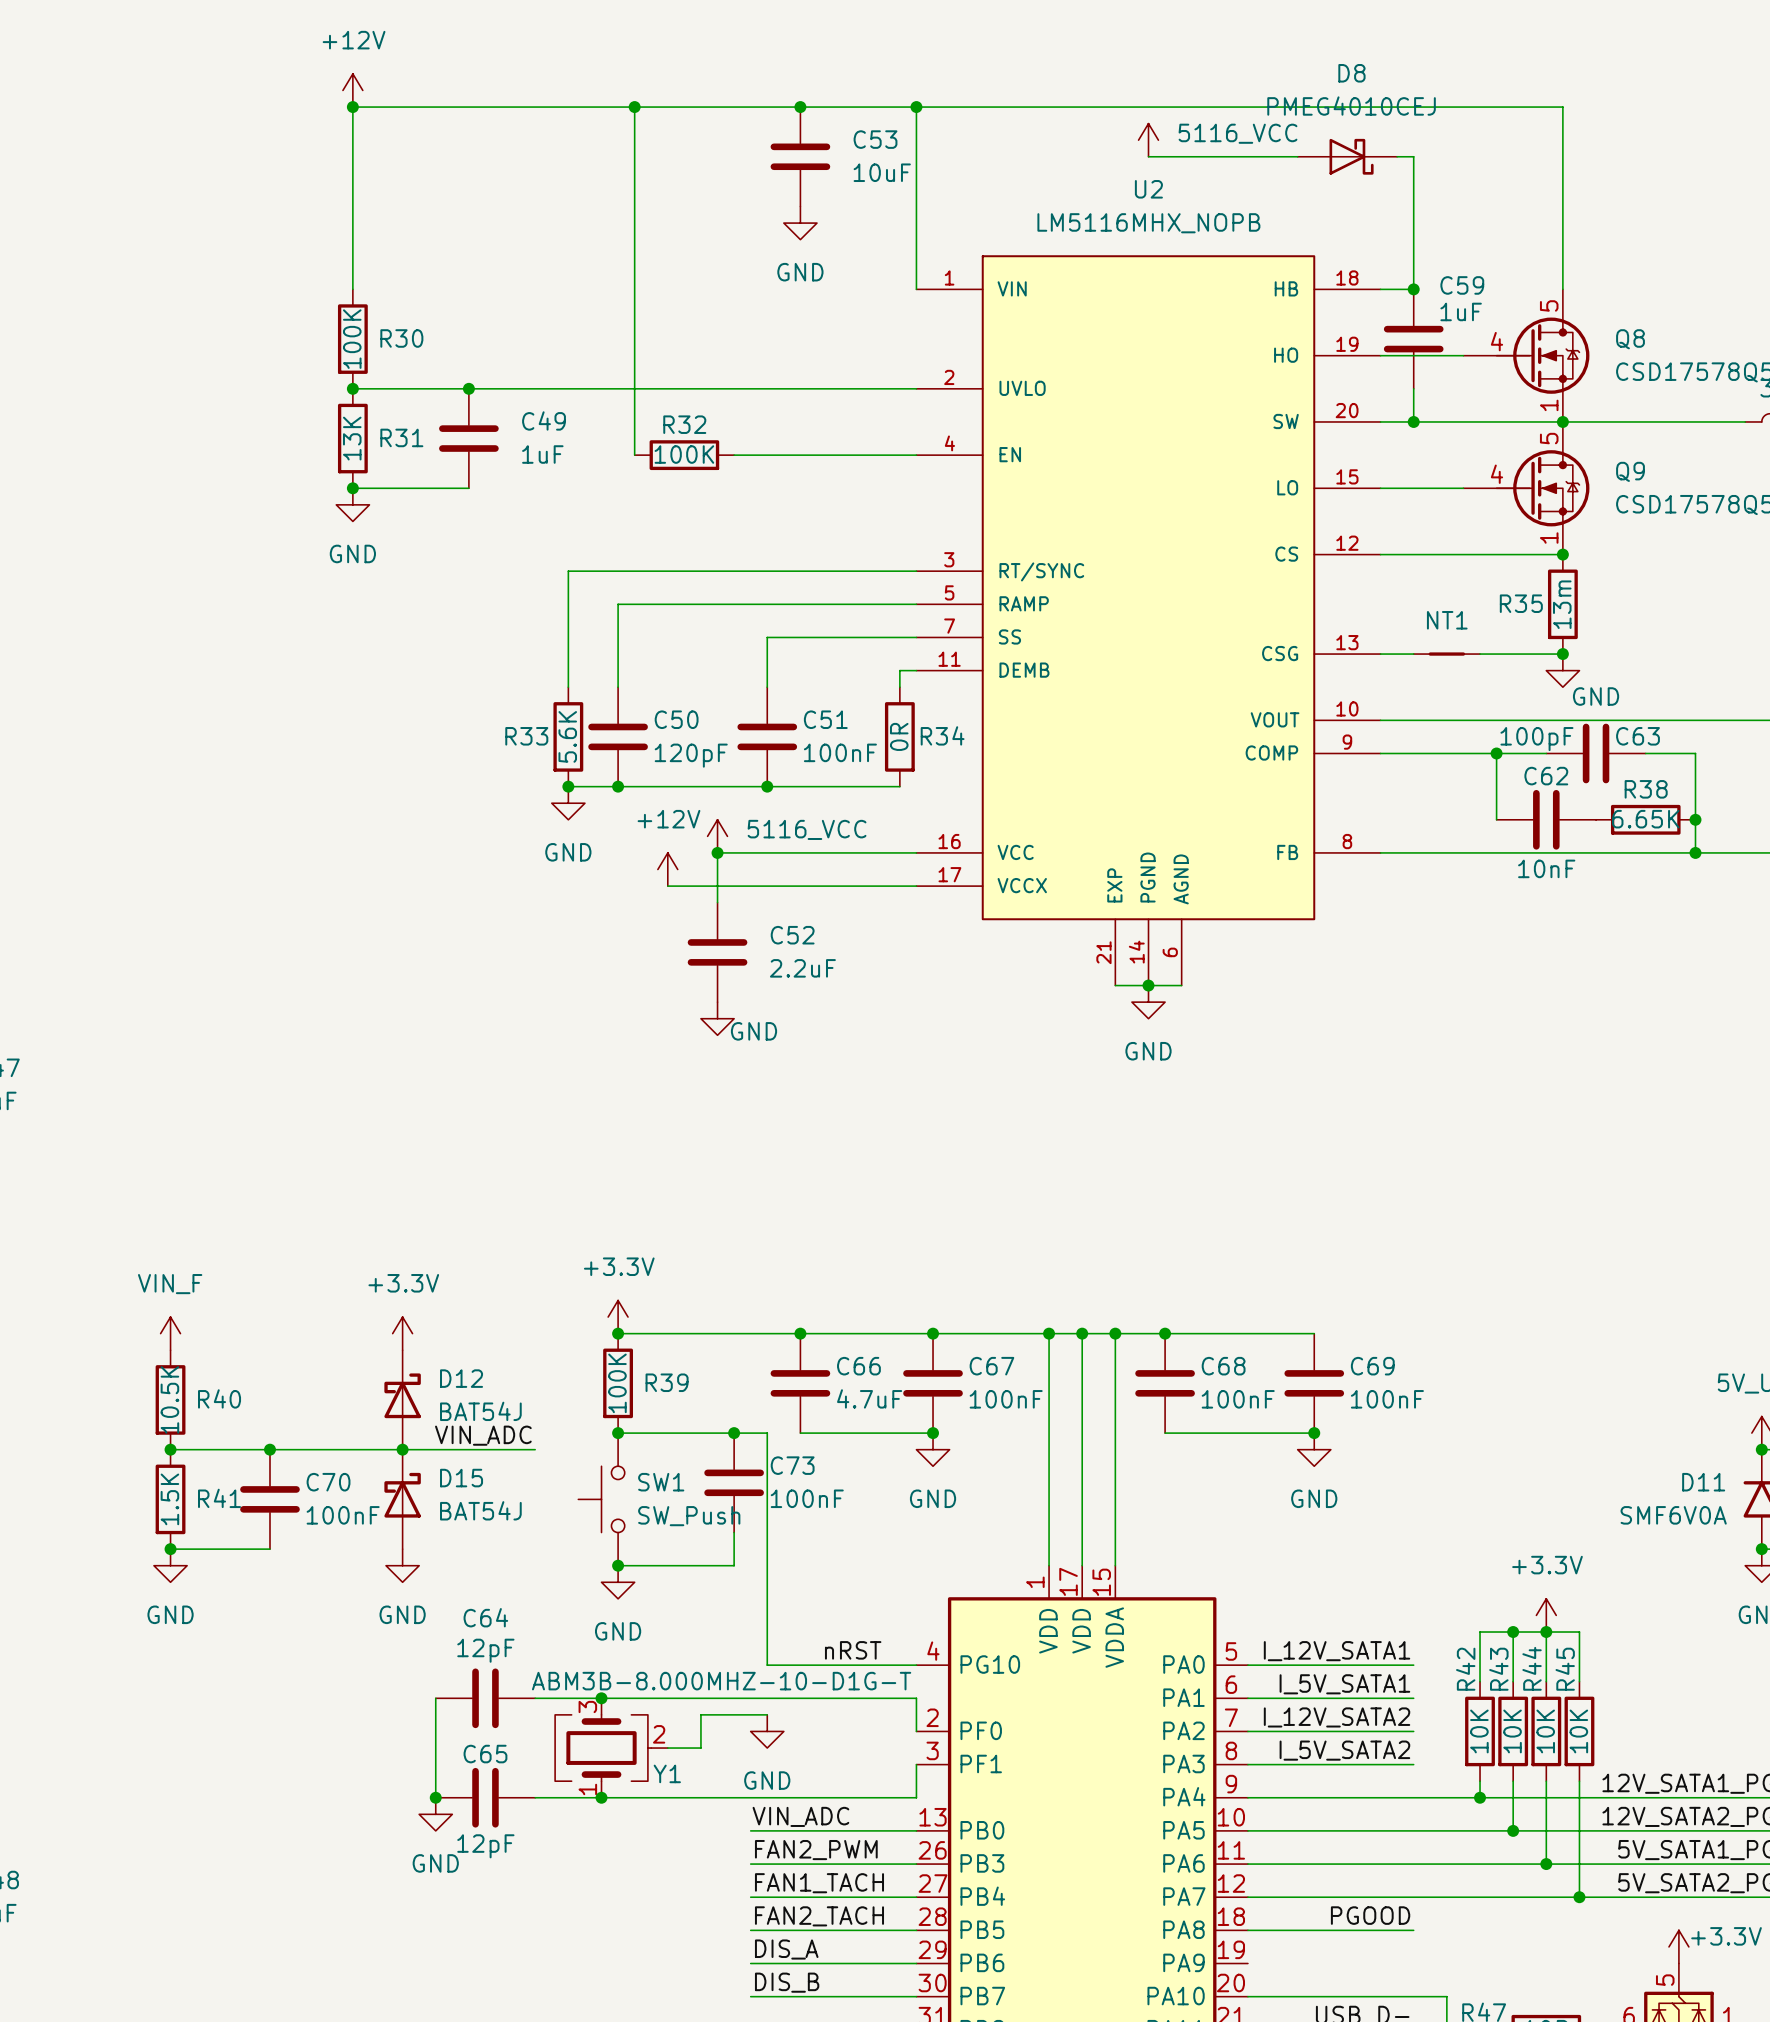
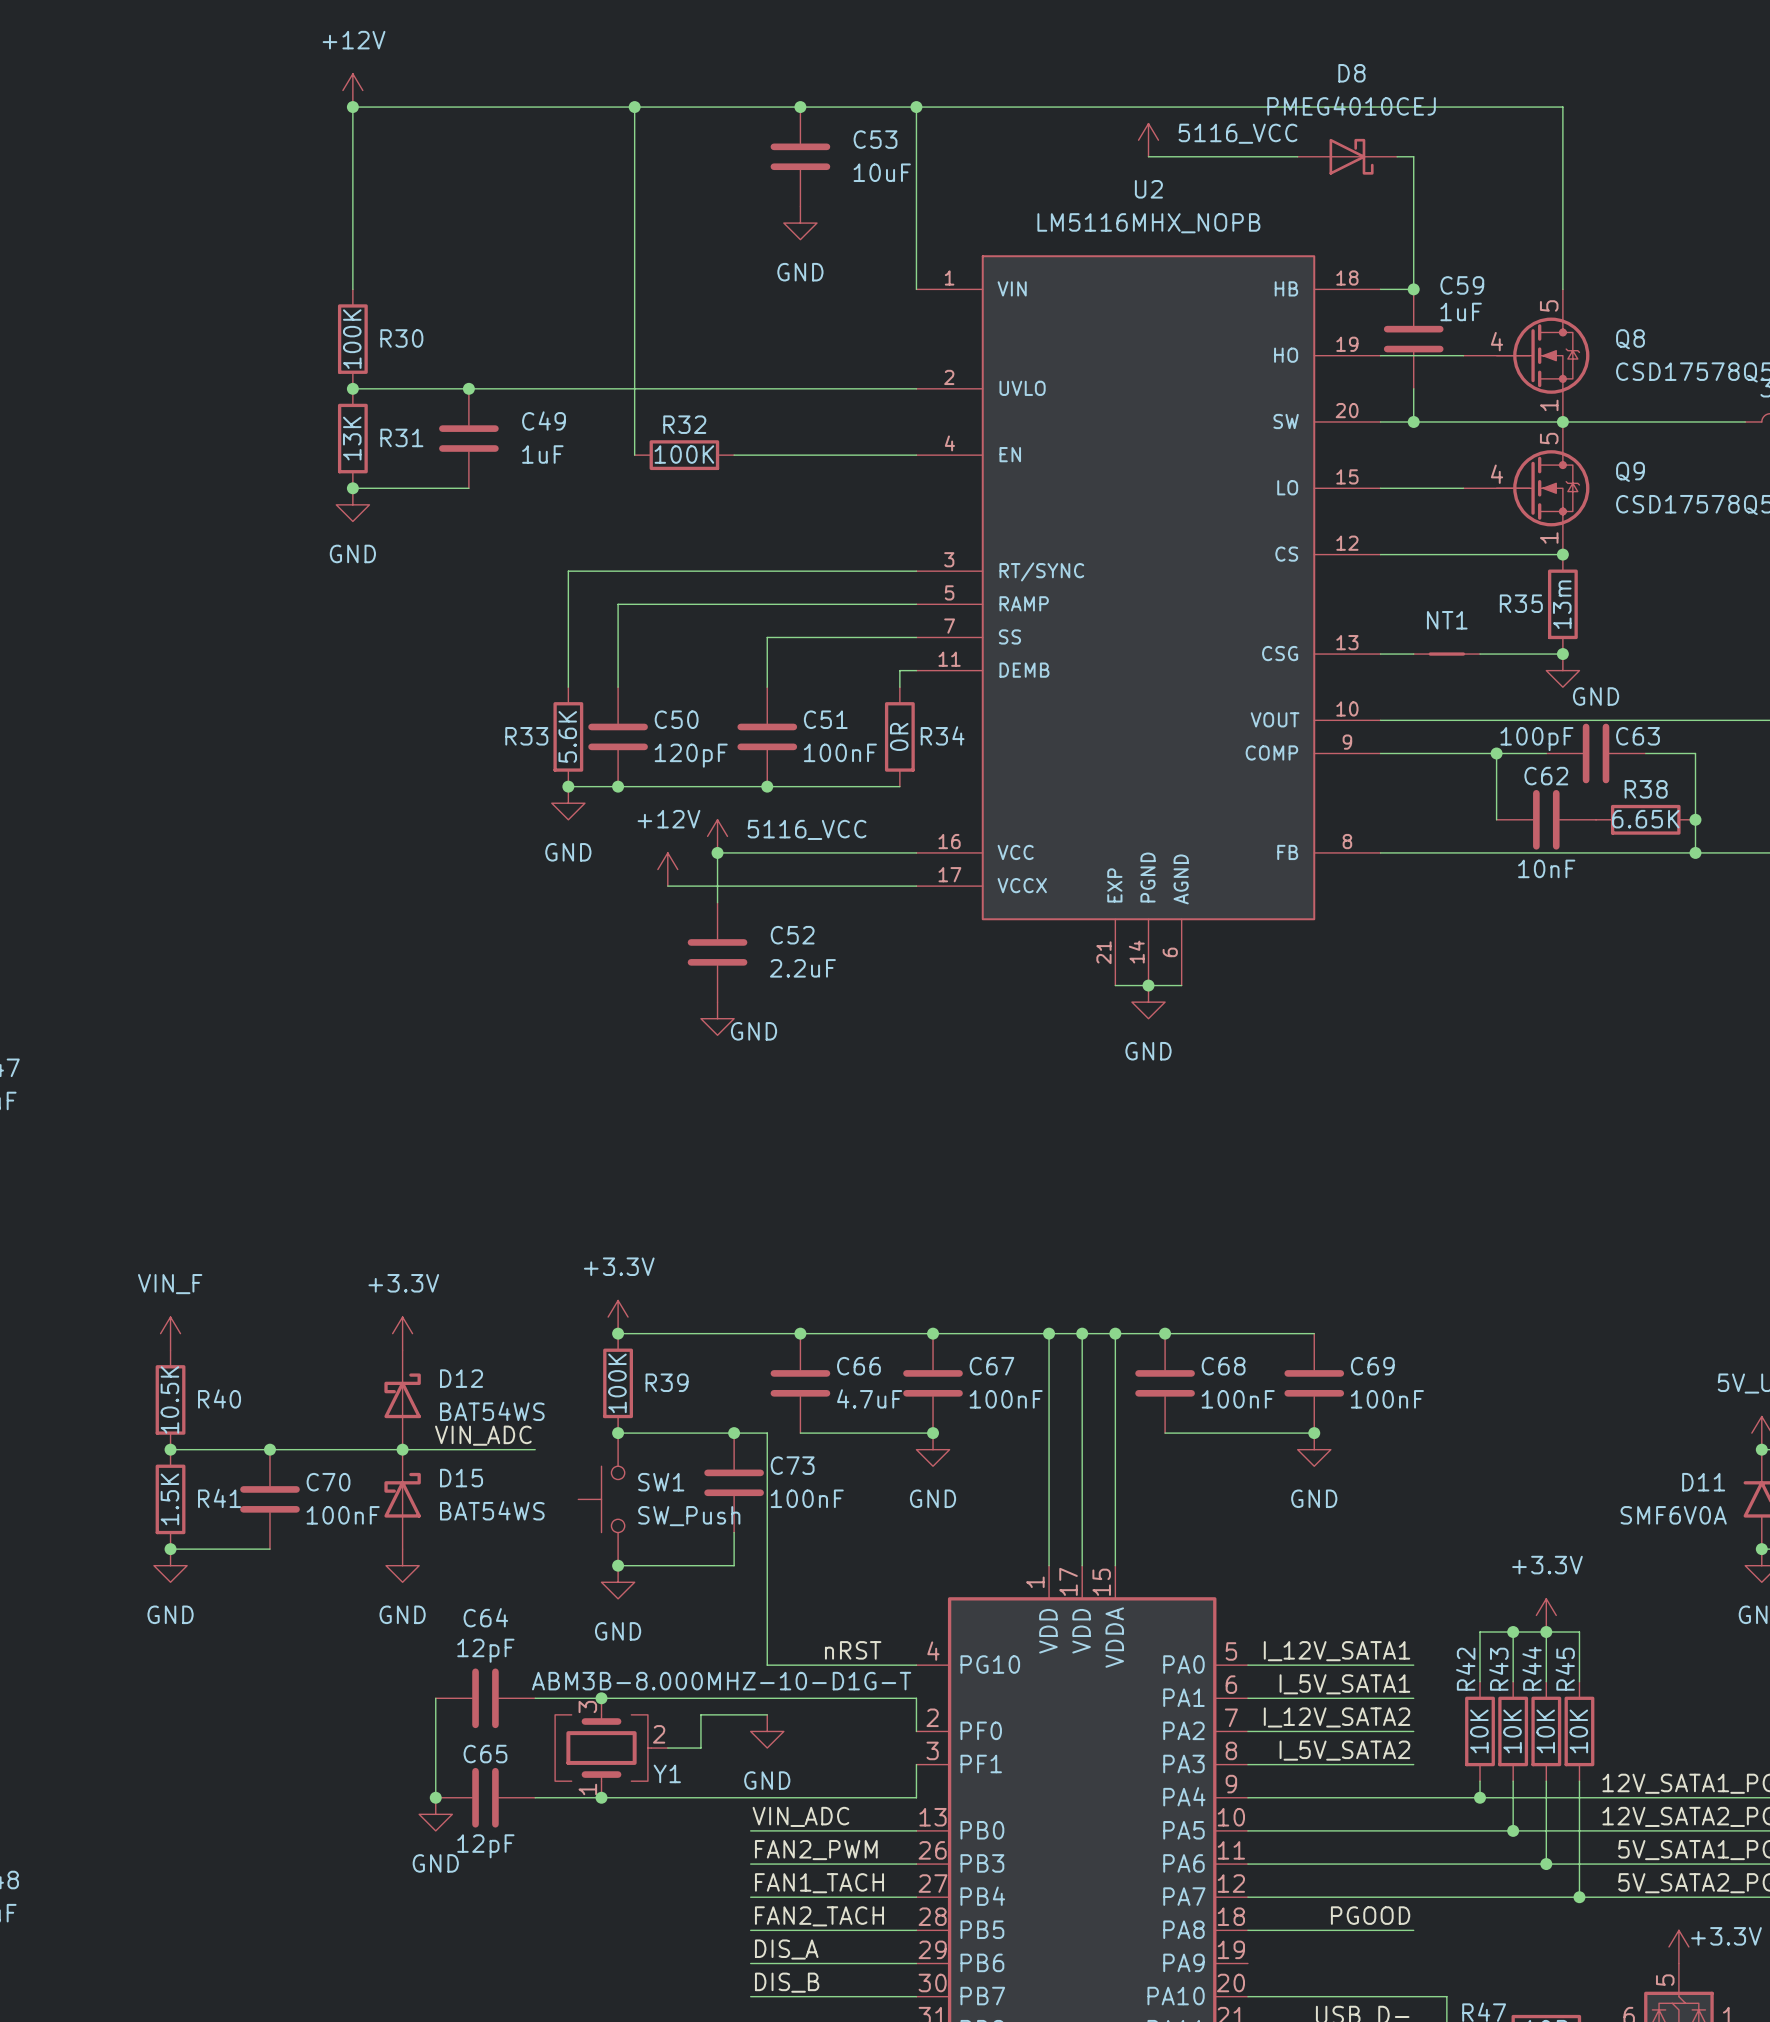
D12 value: BAT54J (480, 1411) -> BAT54WS (492, 1411)
D15 value: BAT54J (480, 1510) -> BAT54WS (492, 1510)

